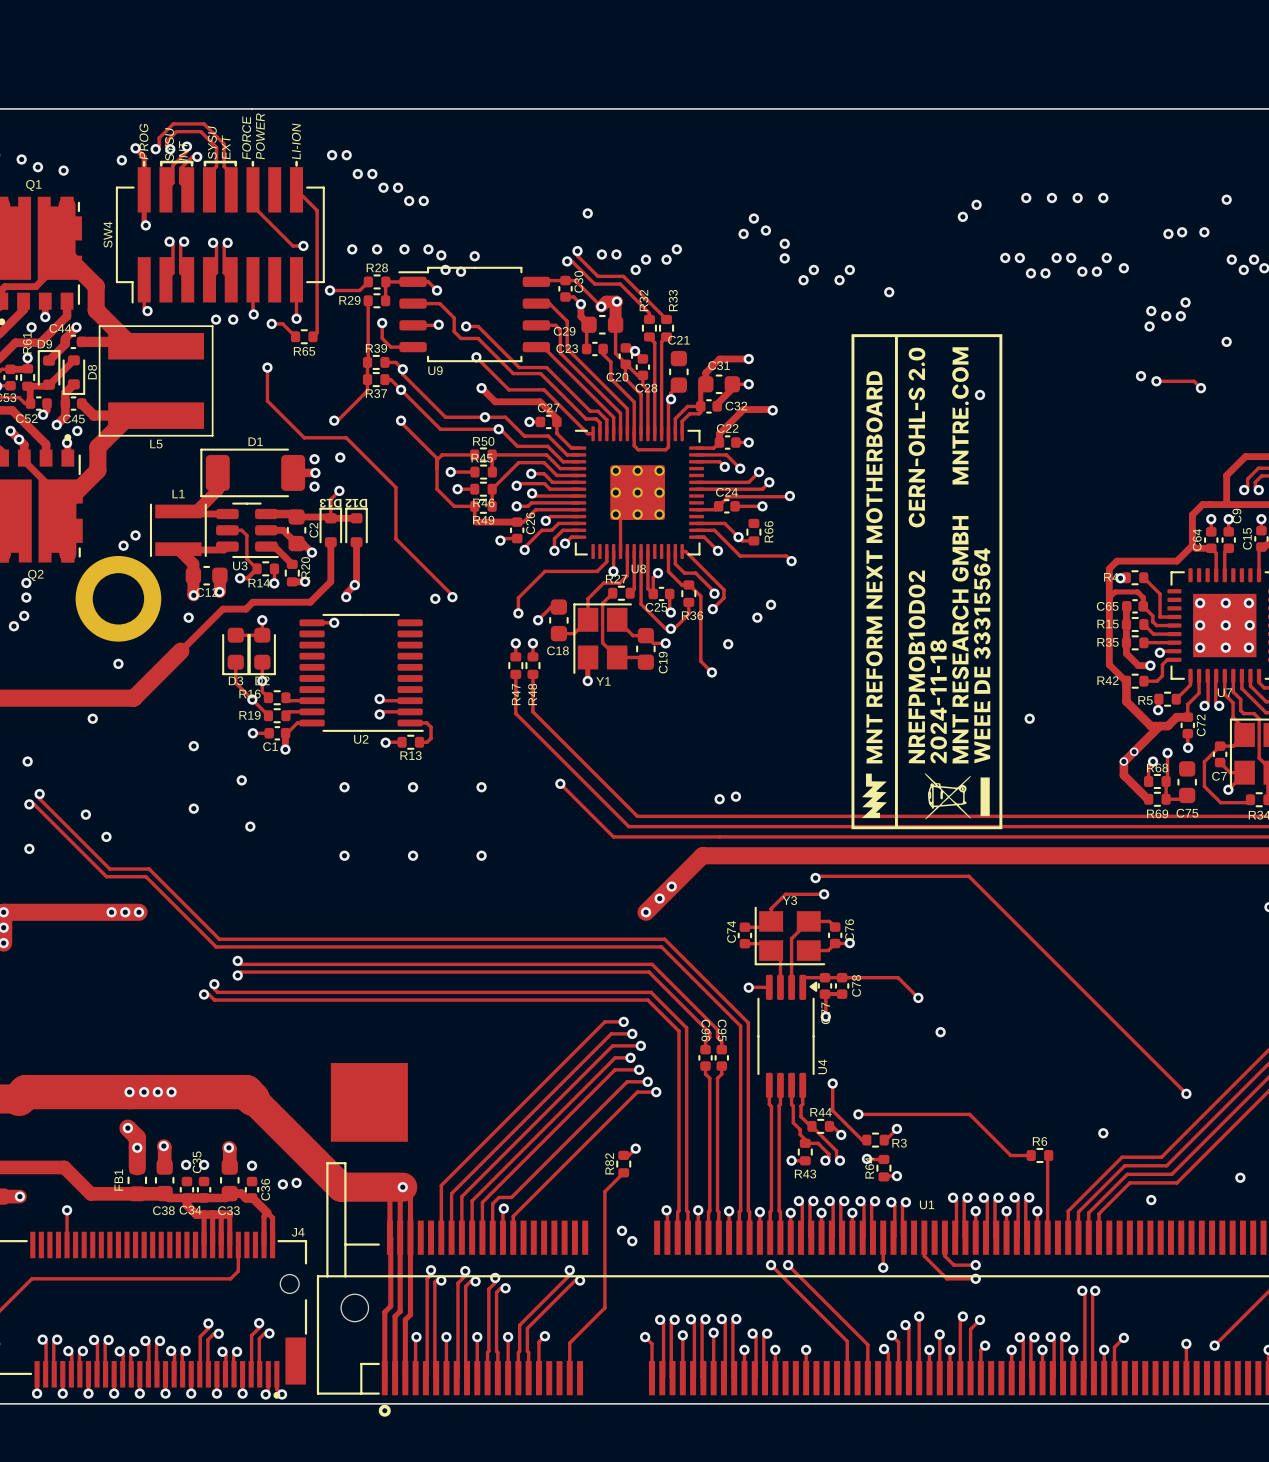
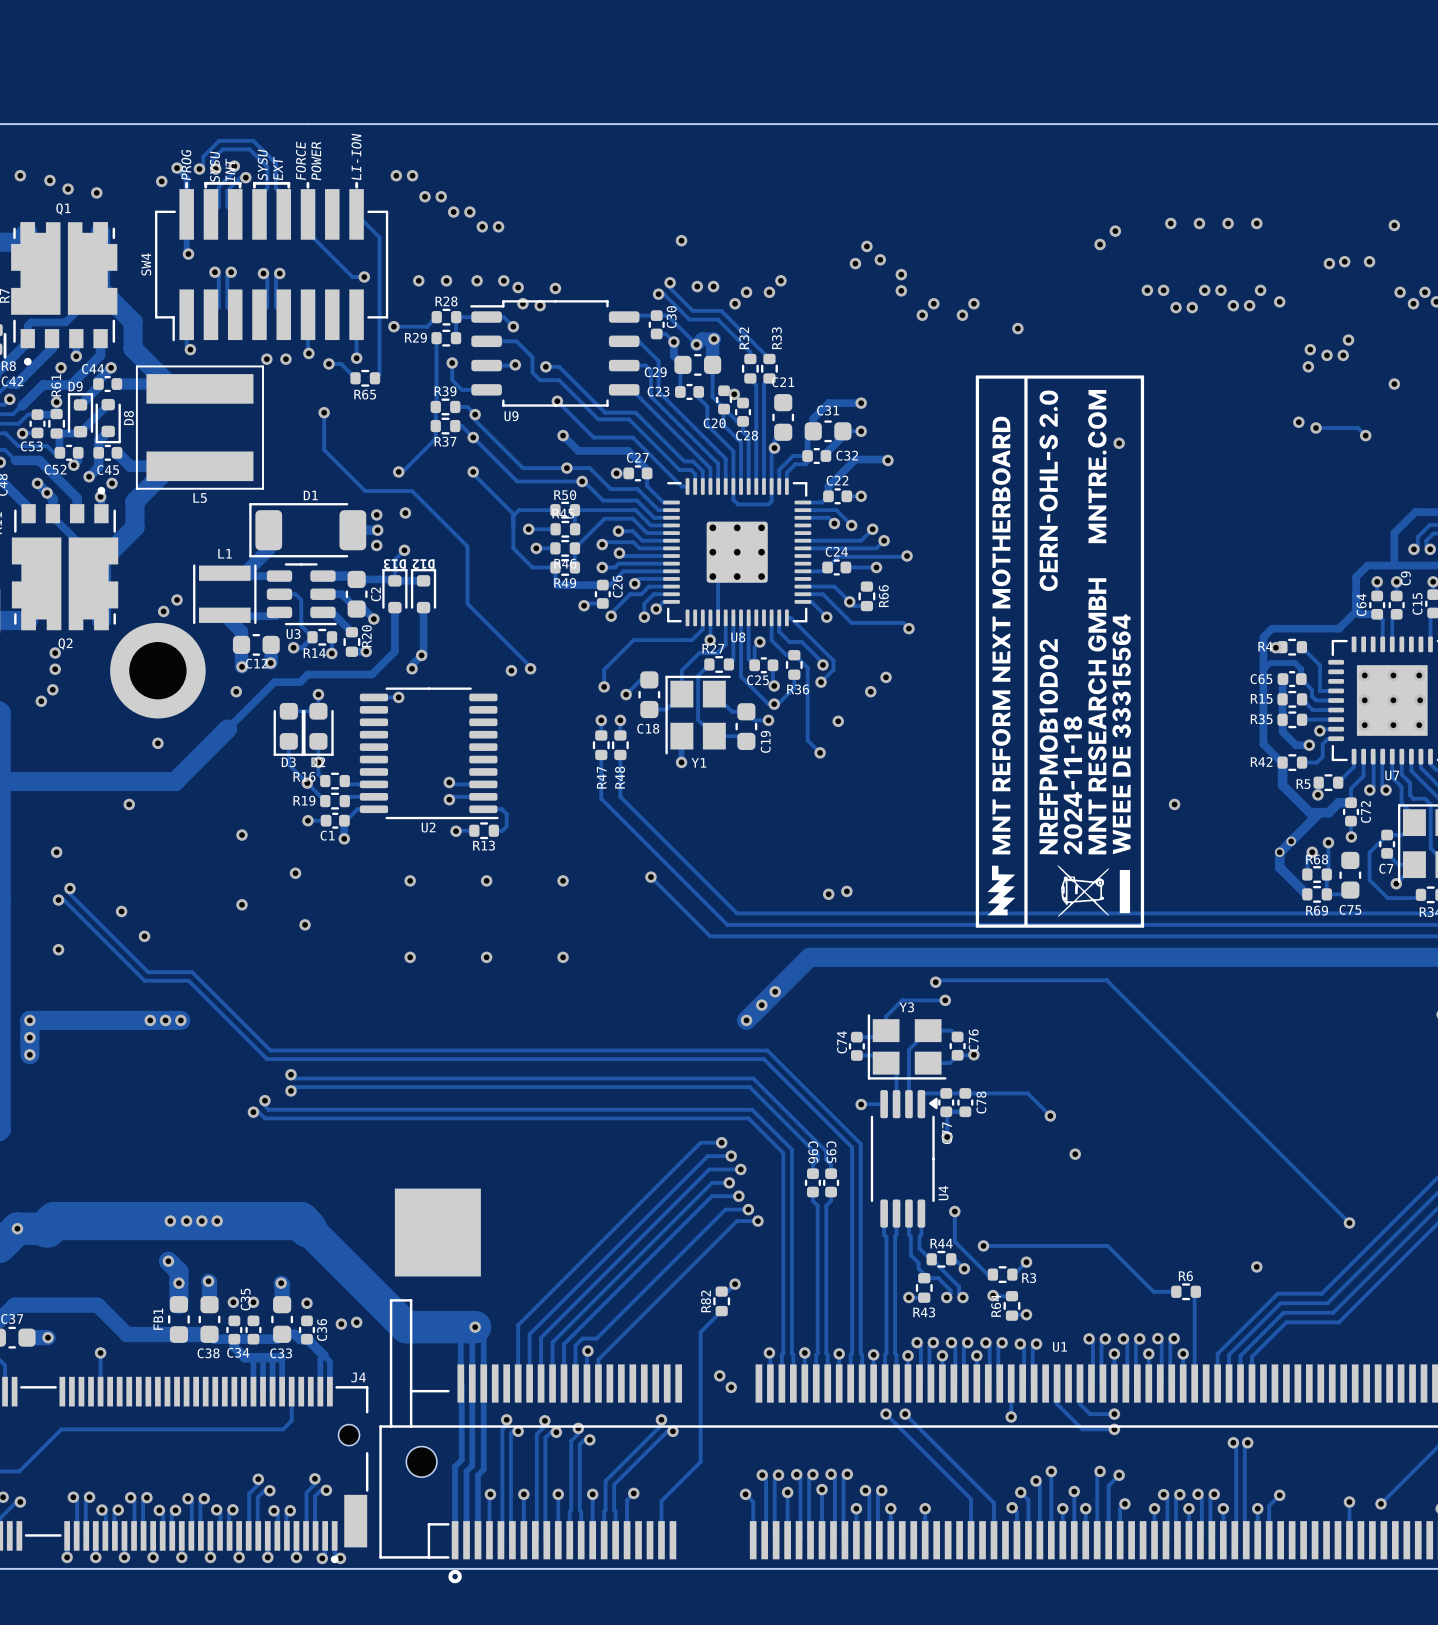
via: (1240, 1177) -> none
via: (1151, 1200) -> none

